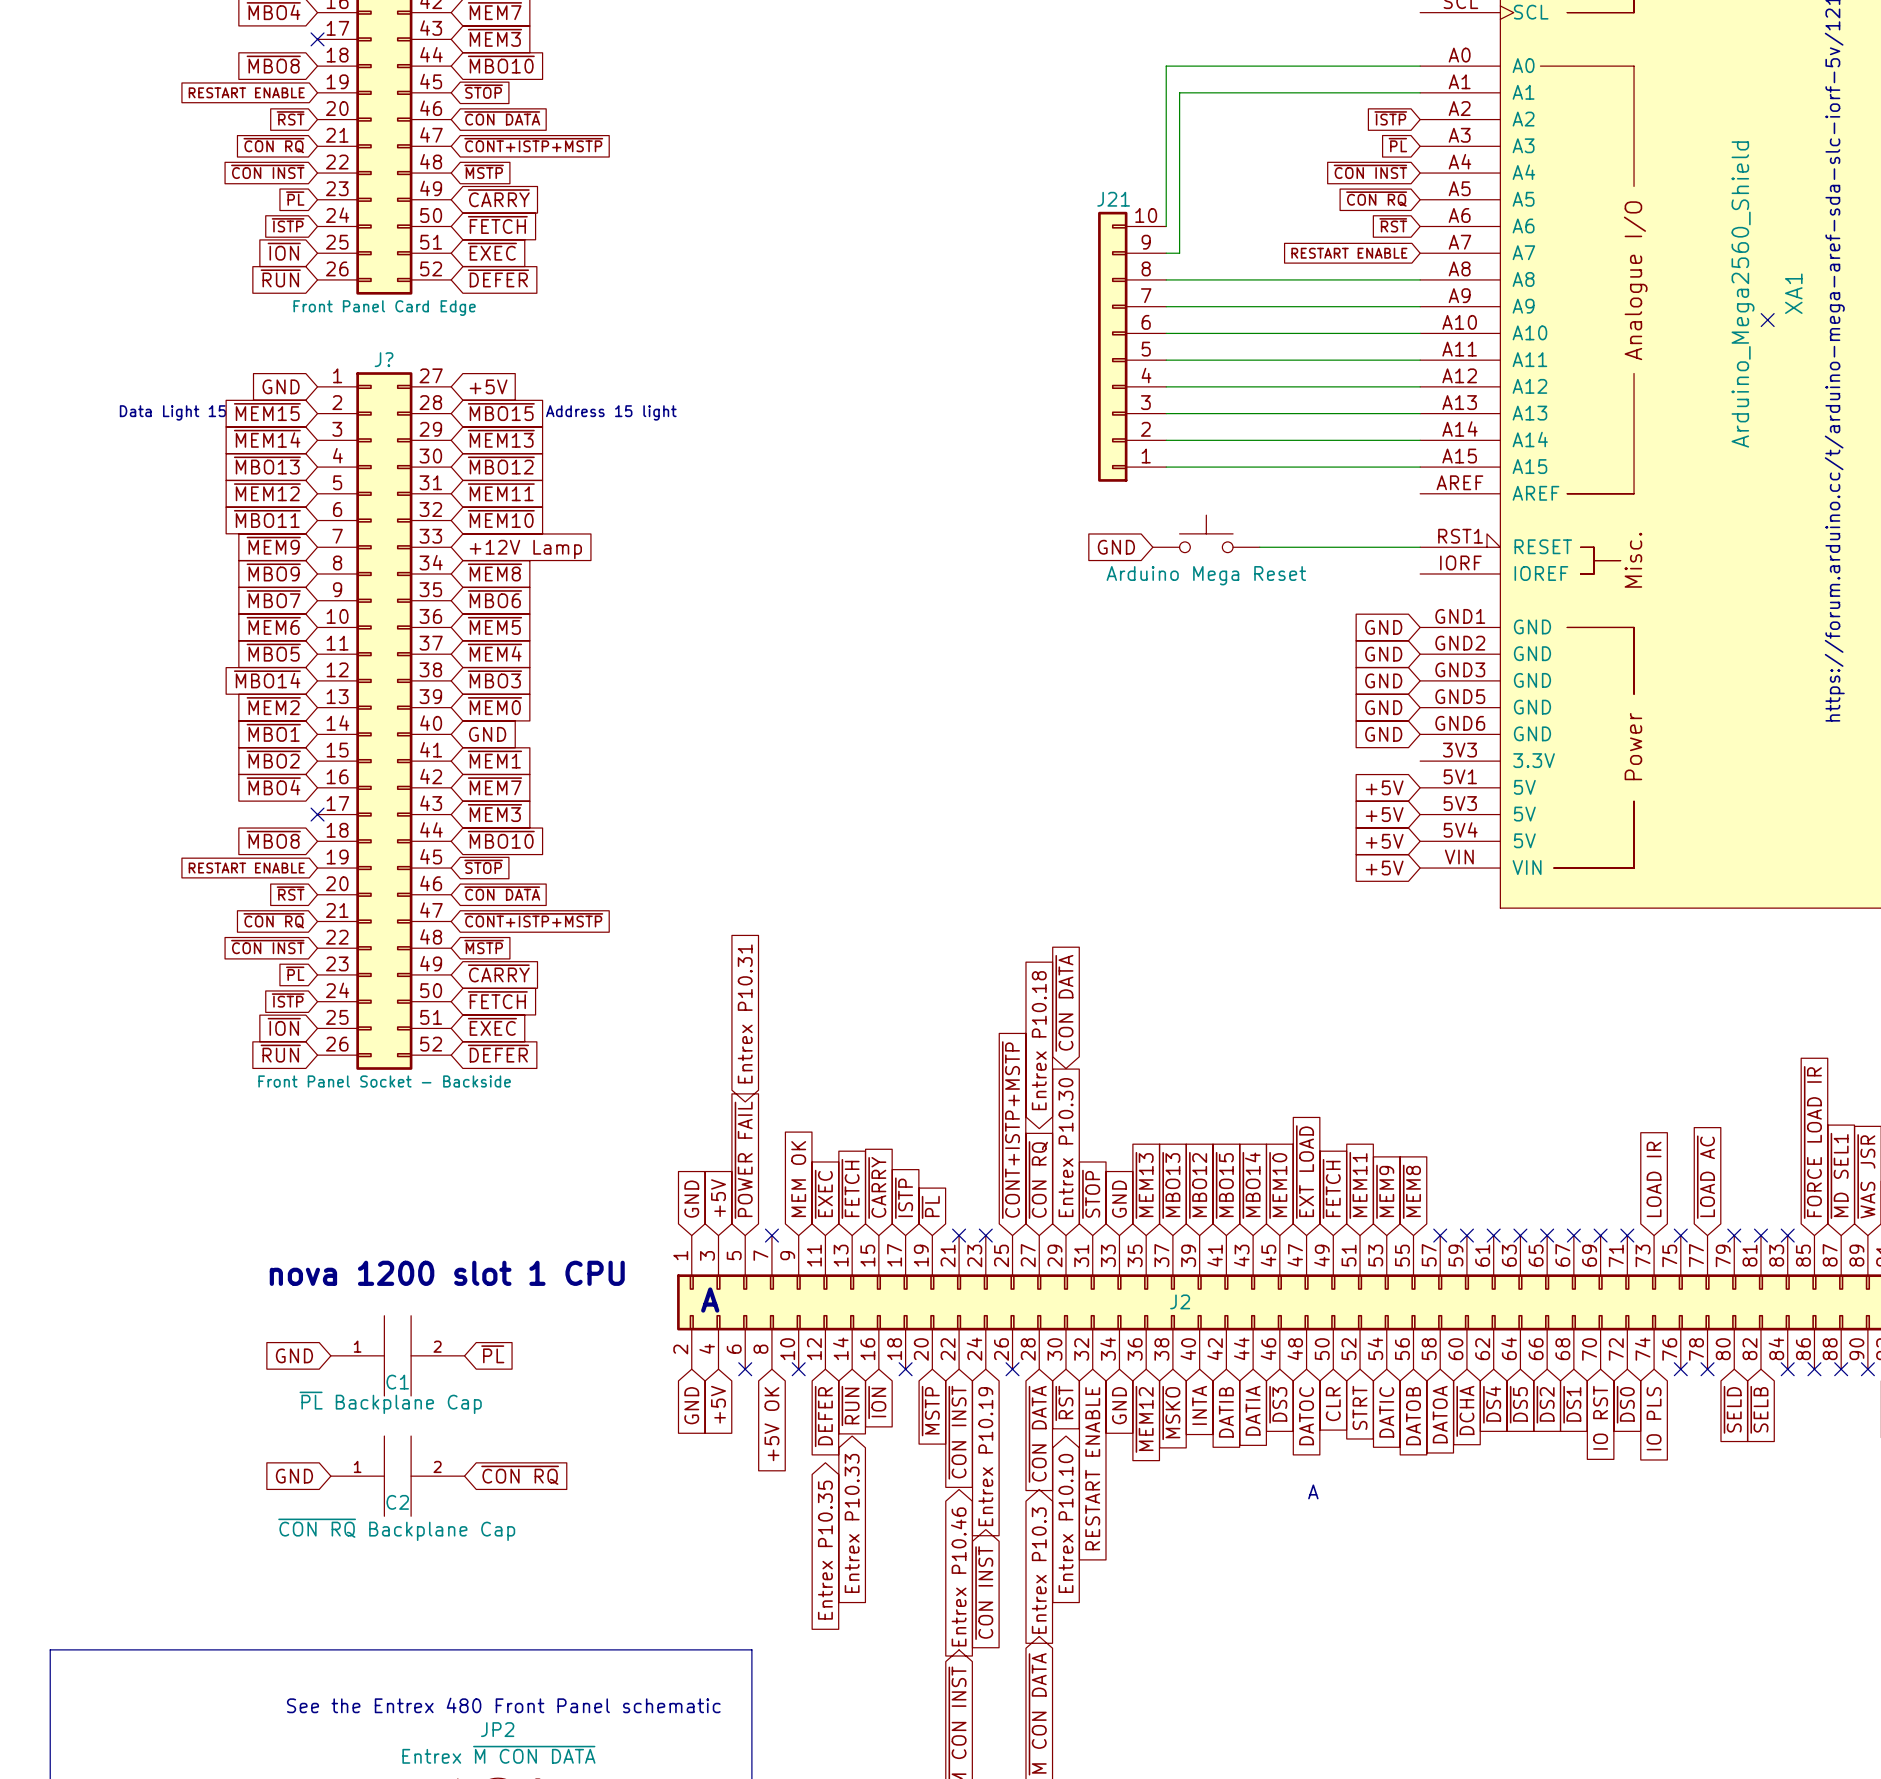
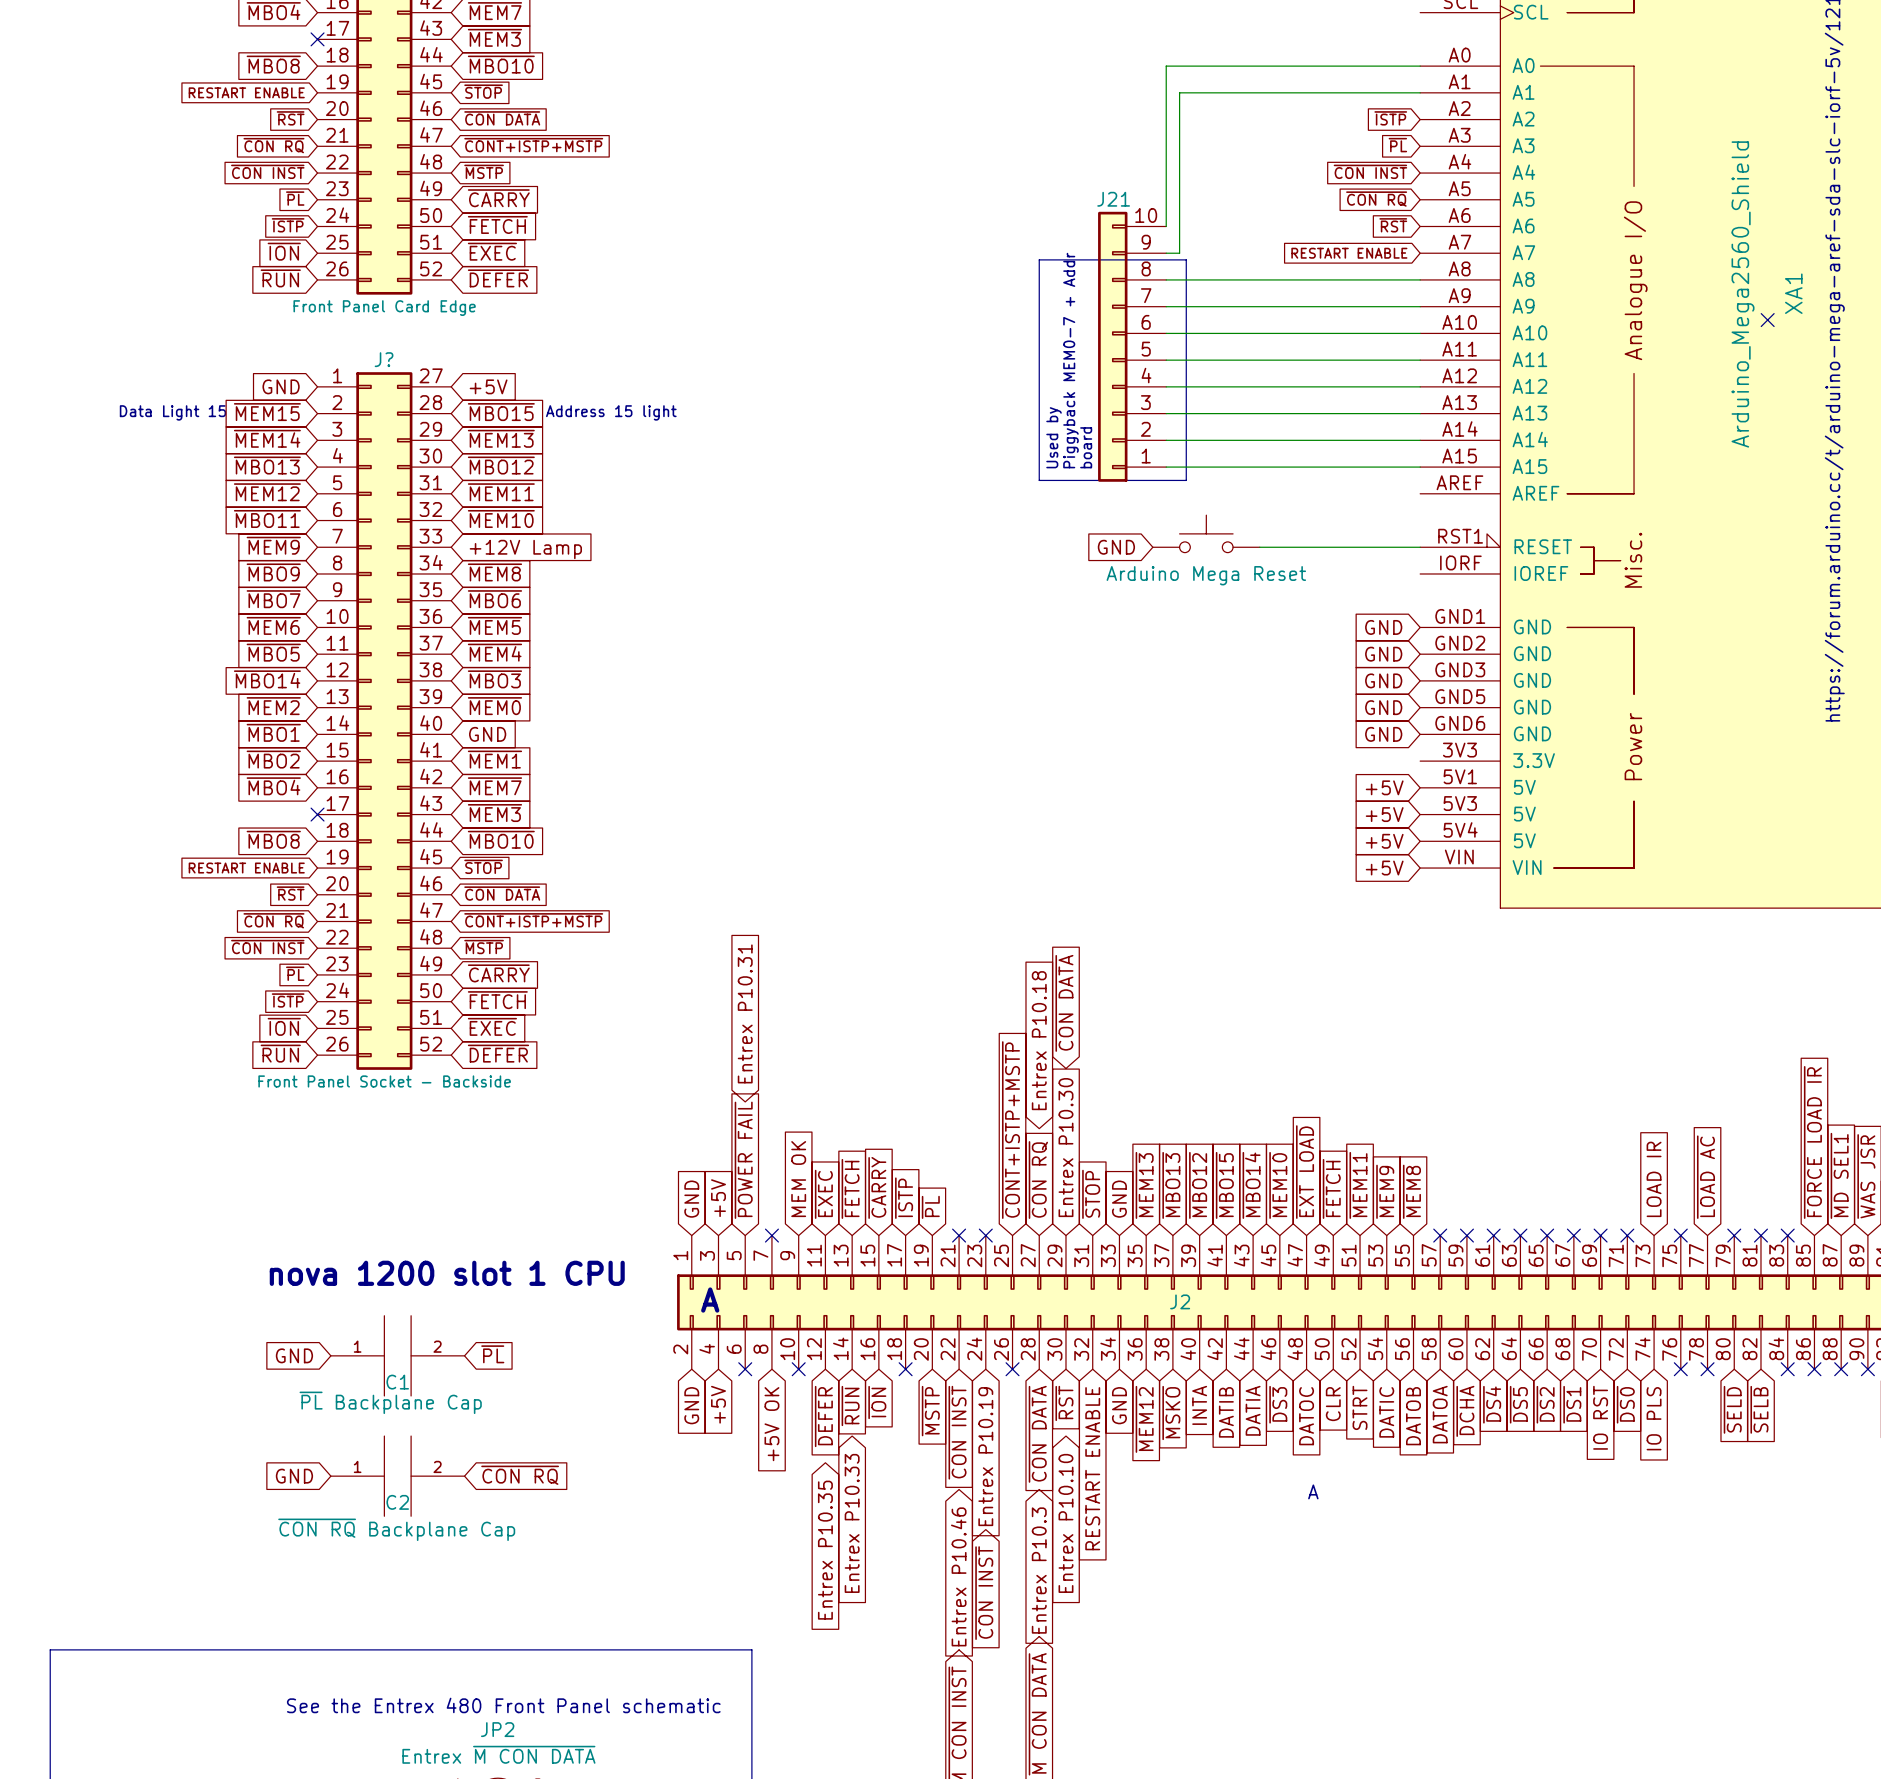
line: none -> (1039, 259) (1186, 259) (1186, 480) (1039, 480) (1039, 259)
text: none -> Piggyback MEM0-7 + Addr (1070, 360)
text: none -> Used by (1054, 437)
text: none -> board (1086, 447)

